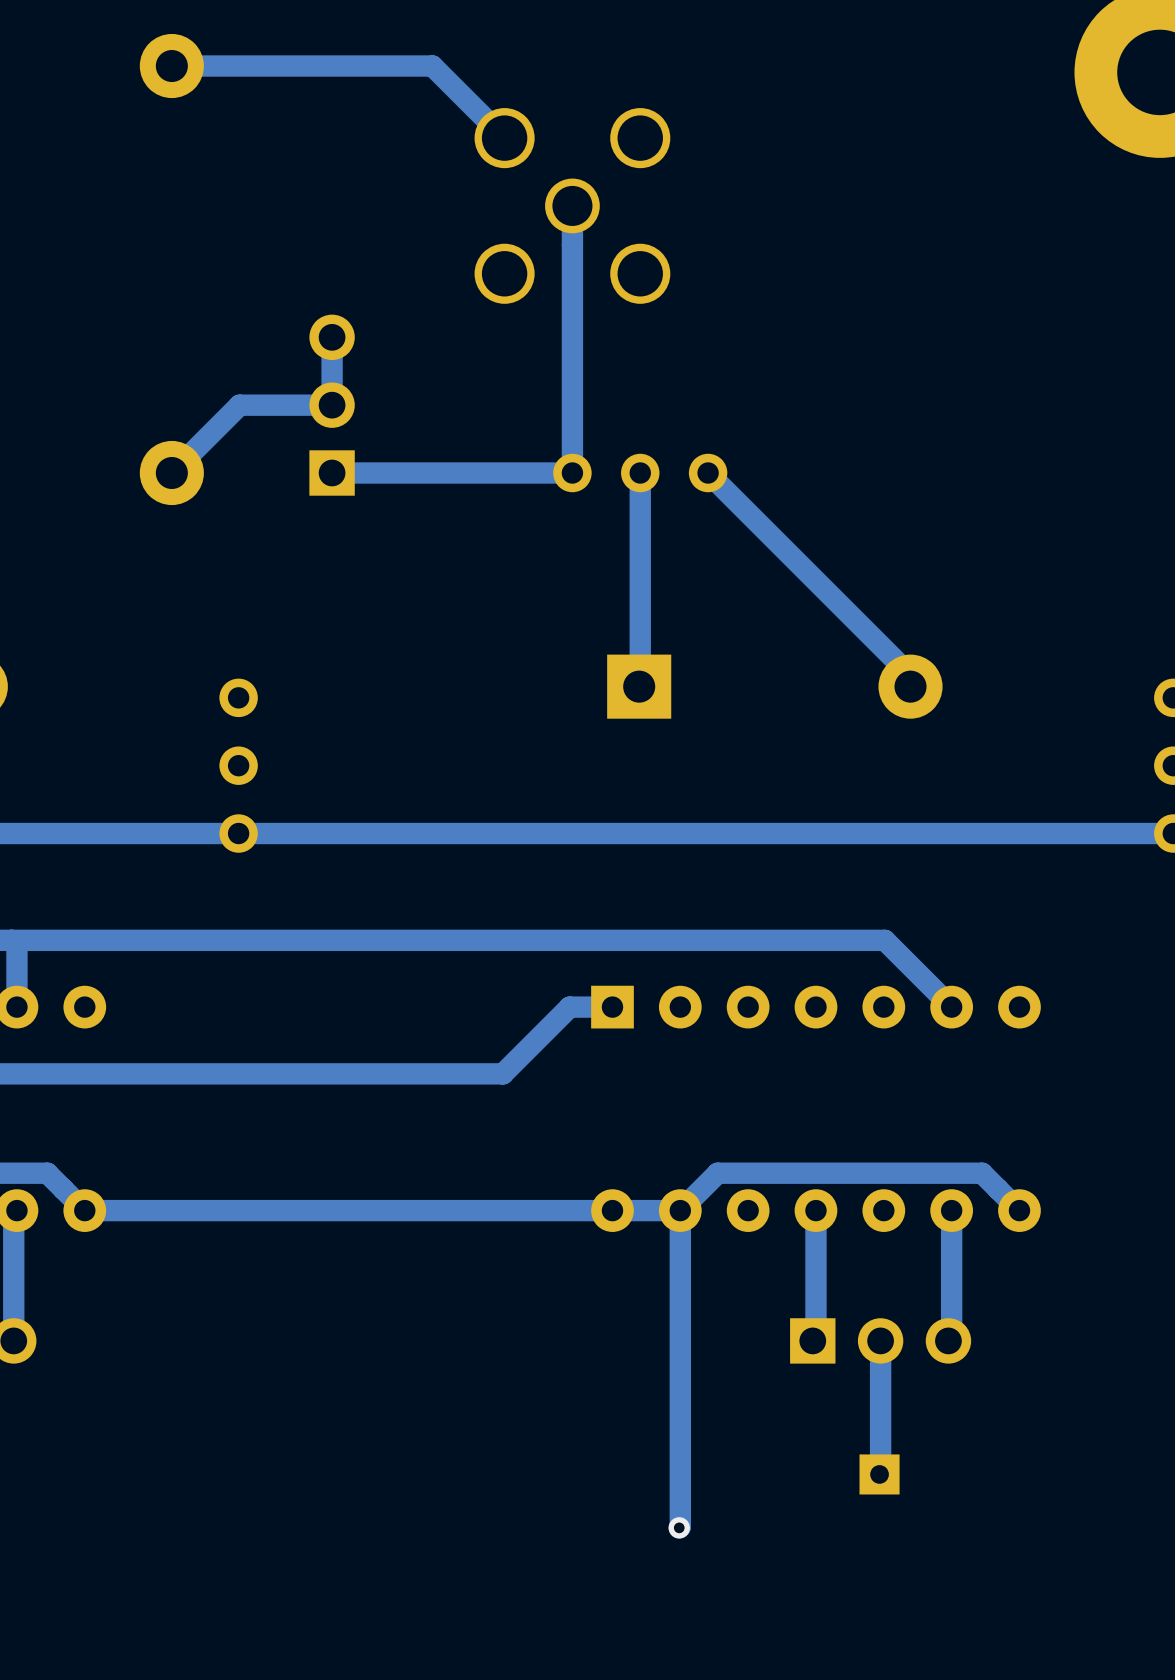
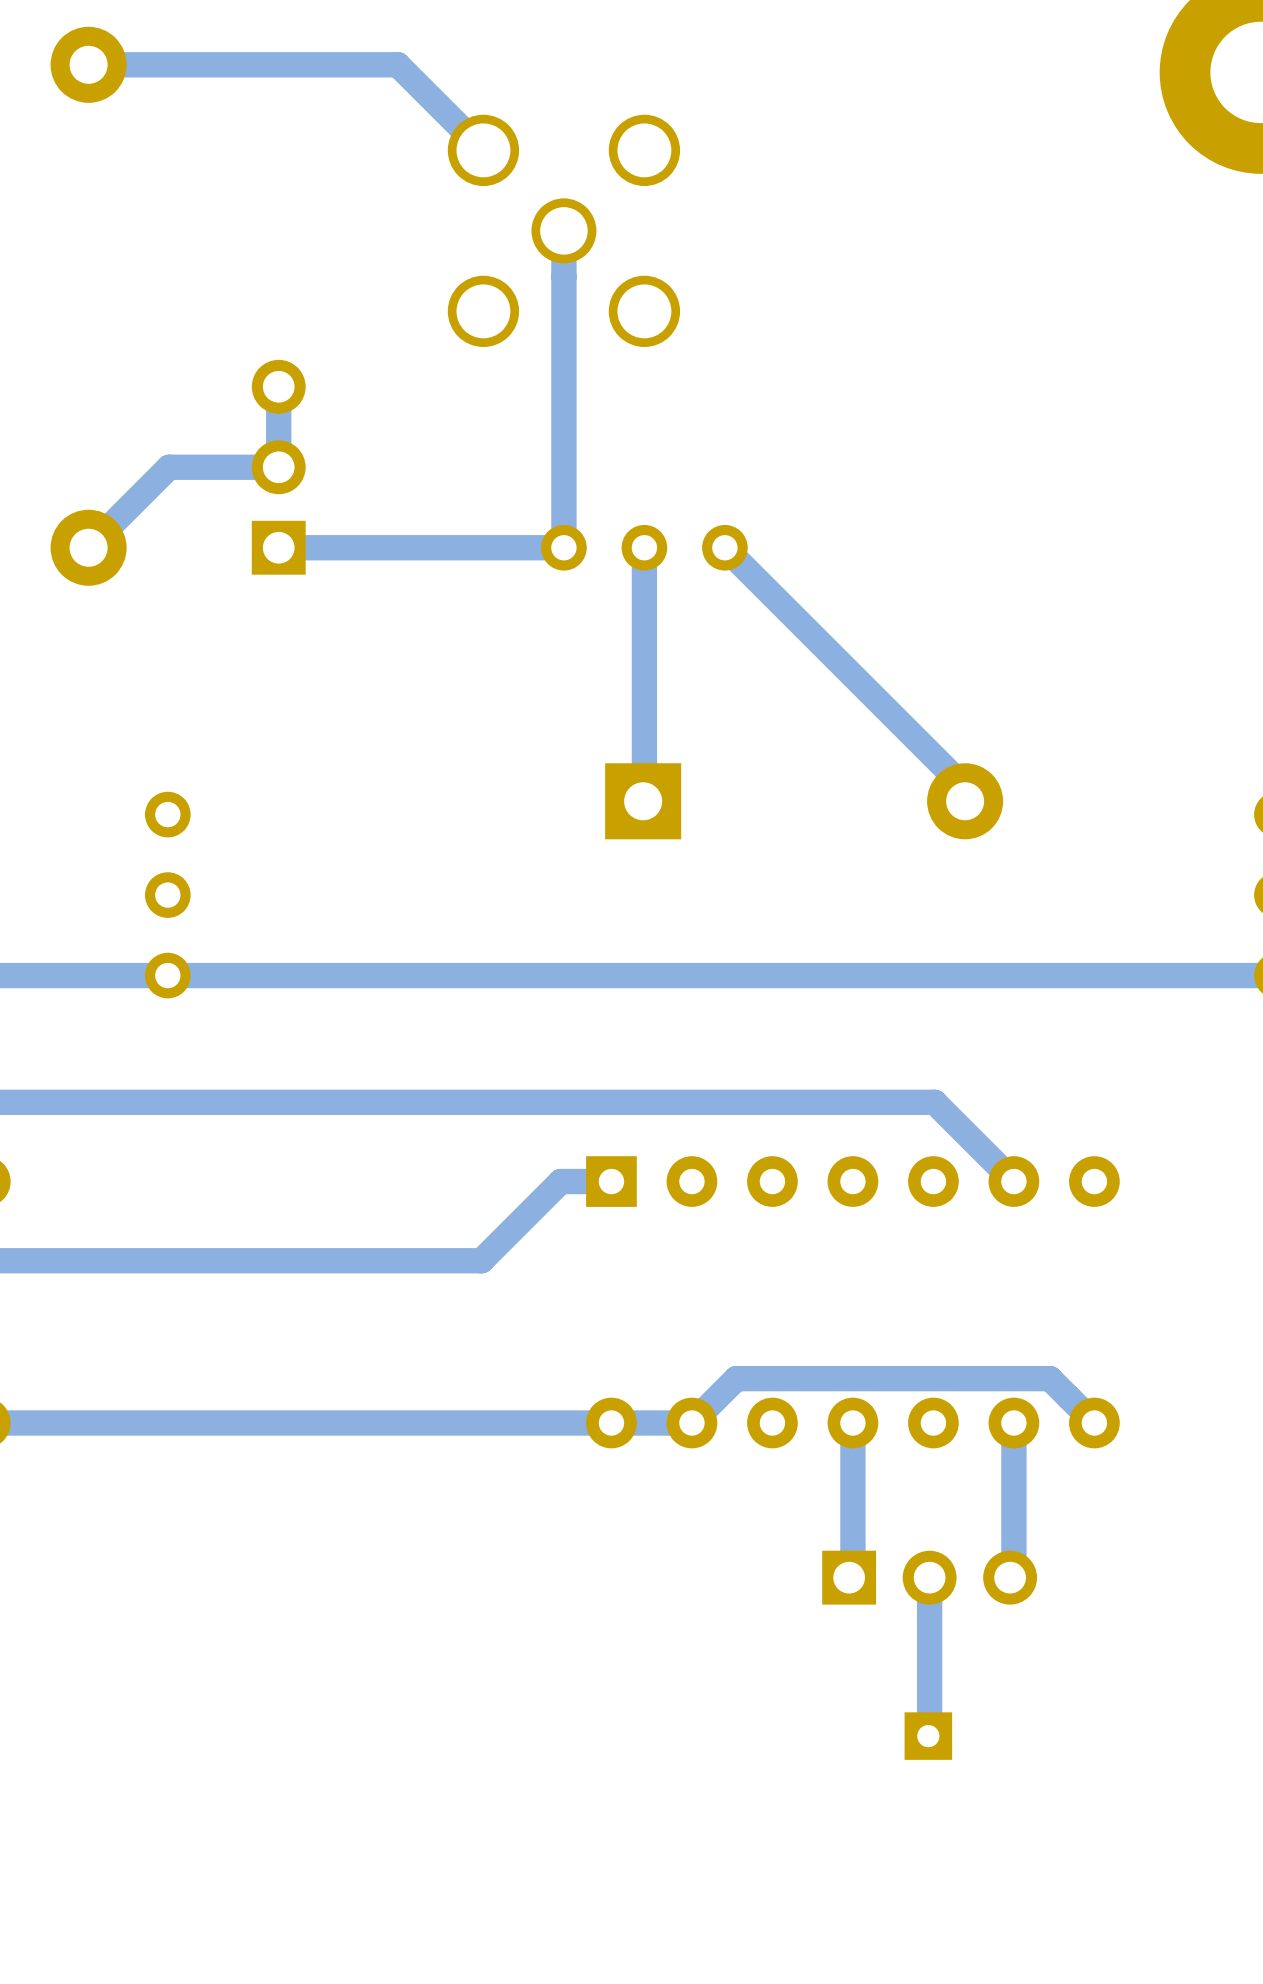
track: (680, 1210) (679, 1527) -> none
via: (679, 1527) -> none

